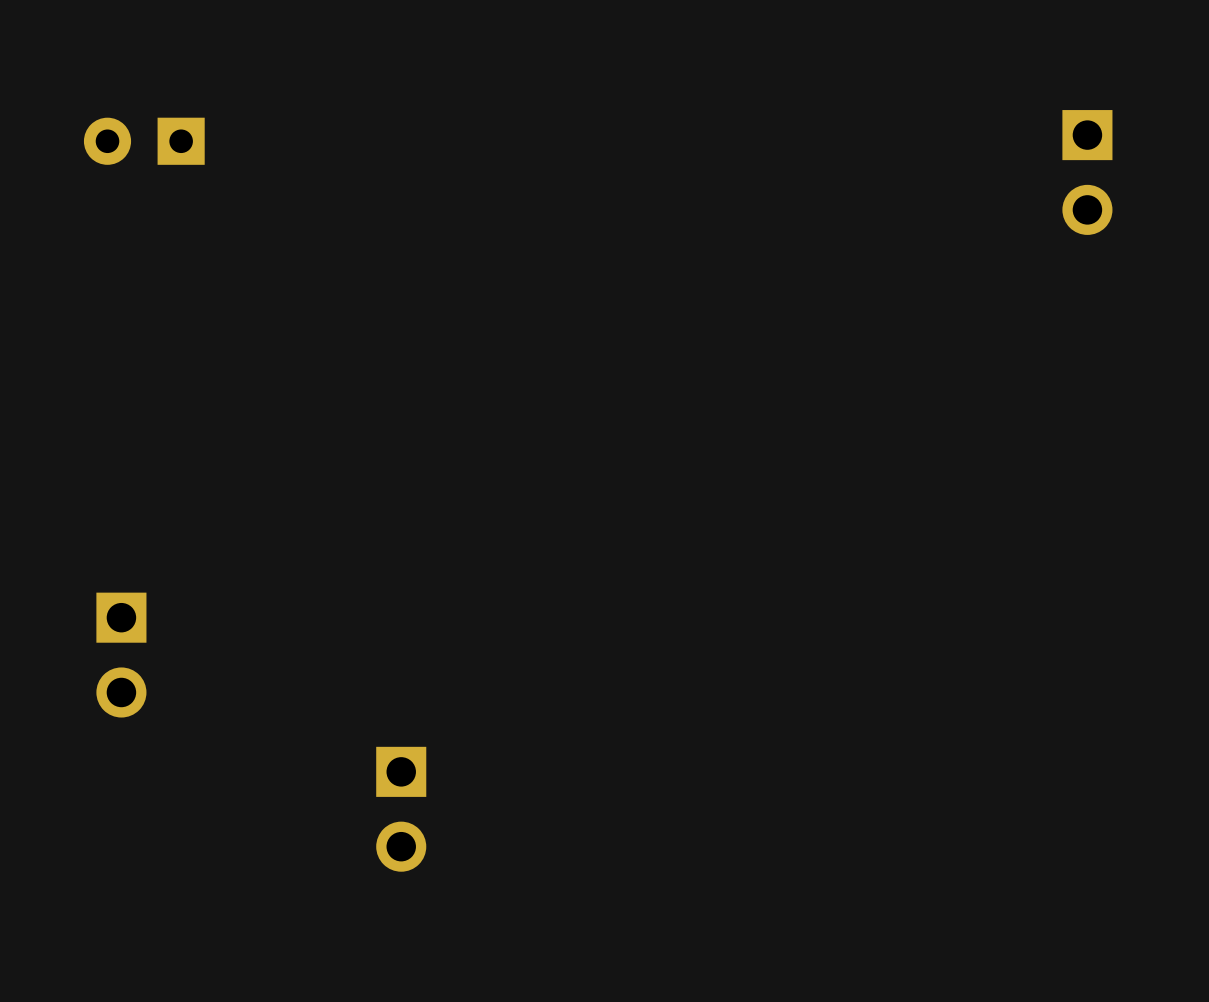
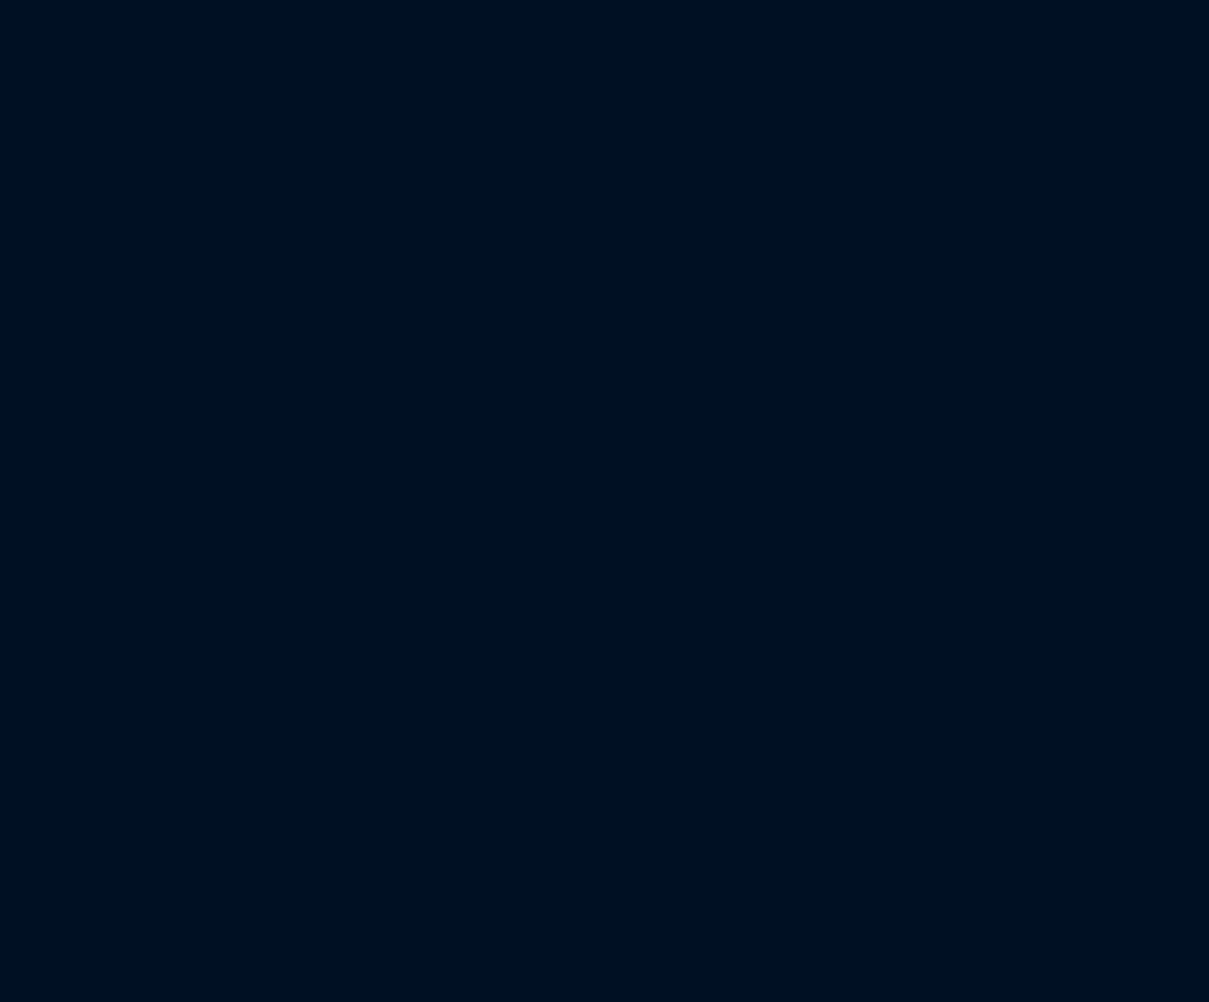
part: (144, 141) -> none
part: (1087, 172) -> none
part: (121, 655) -> none
part: (401, 809) -> none

